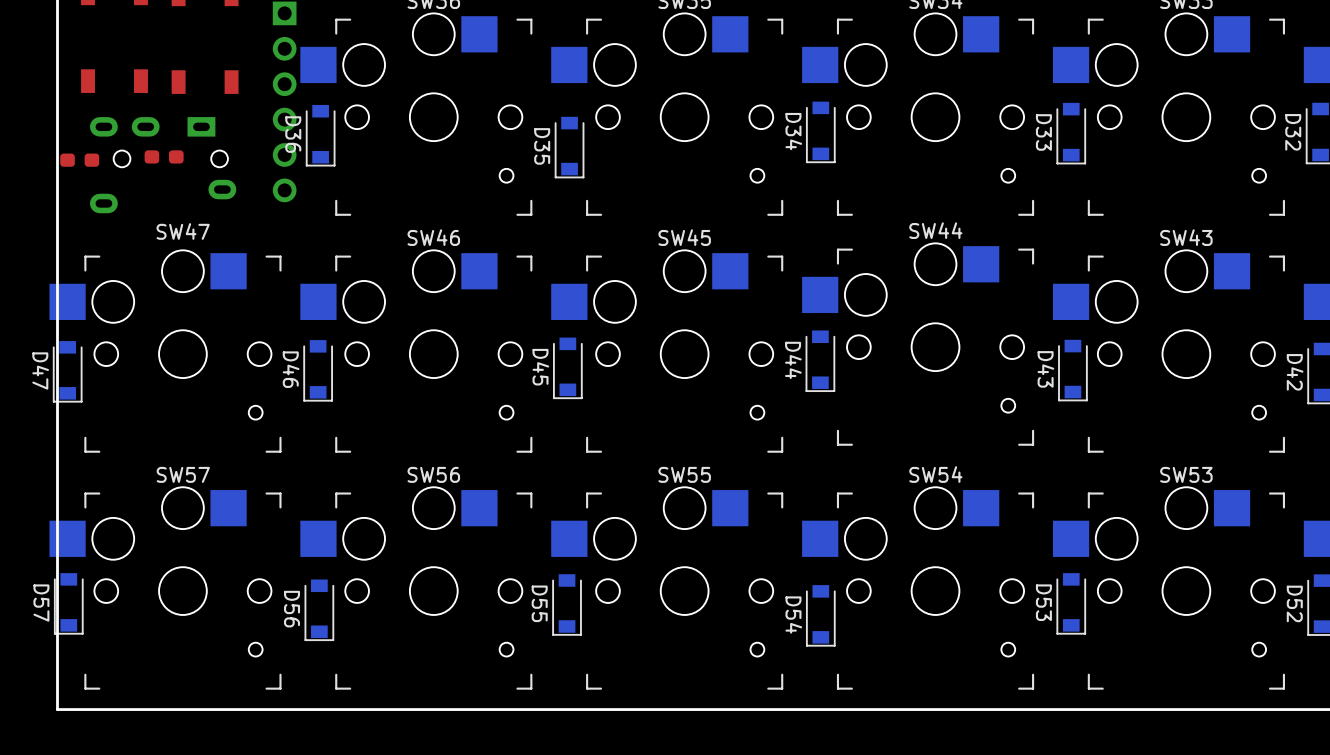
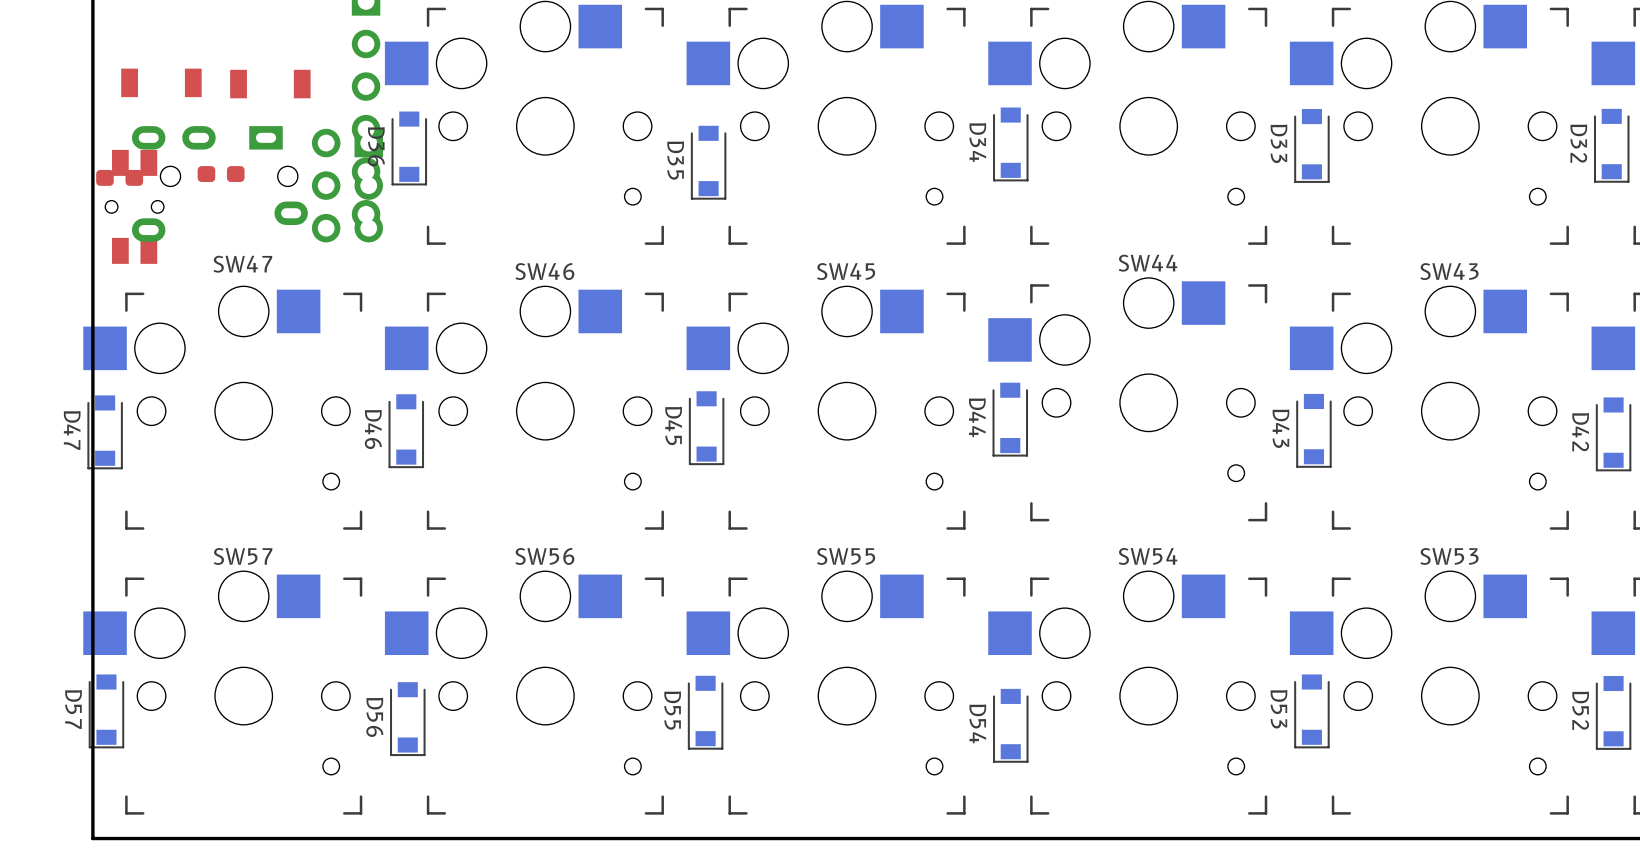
part: none -> (347, 185)
part: none -> (134, 206)

